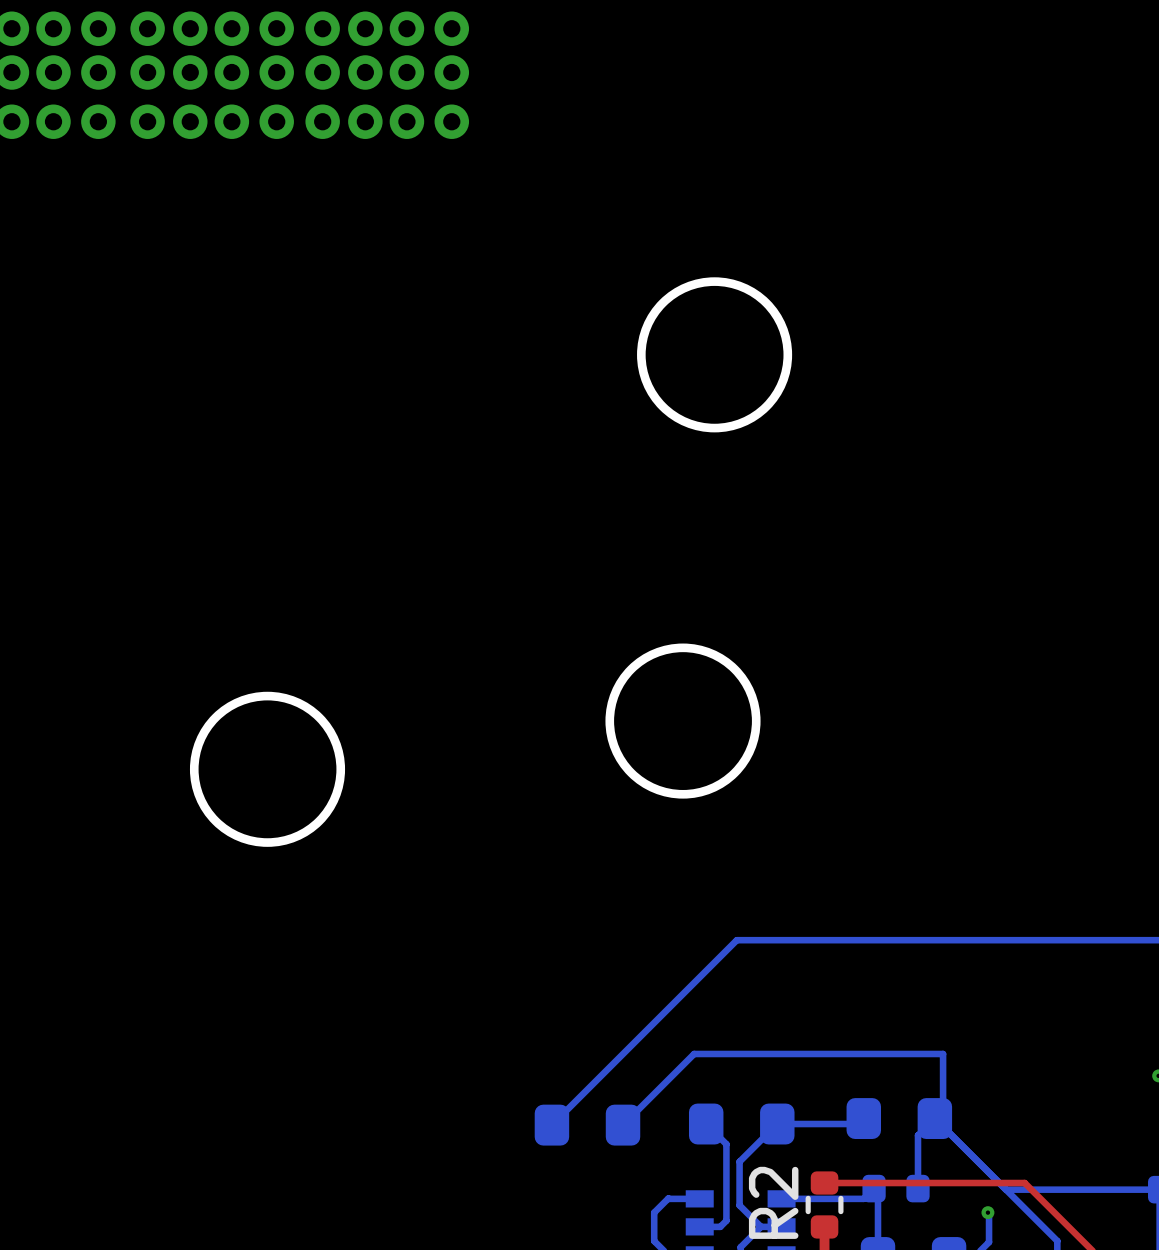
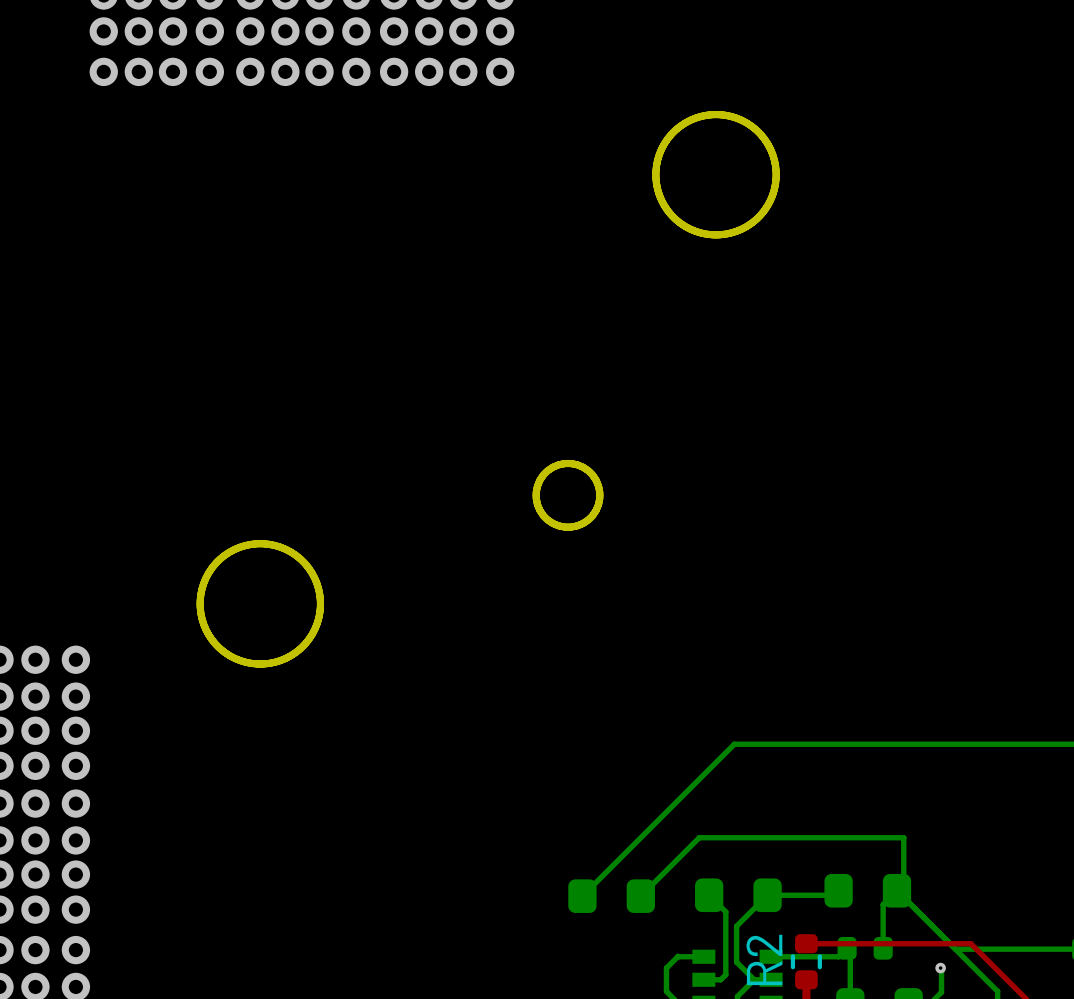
round board edge position: (714, 354) -> (716, 174)
round board edge: none -> [532, 459, 604, 531]
round board edge: [605, 643, 761, 799] -> none
round board edge position: (267, 769) -> (260, 603)

